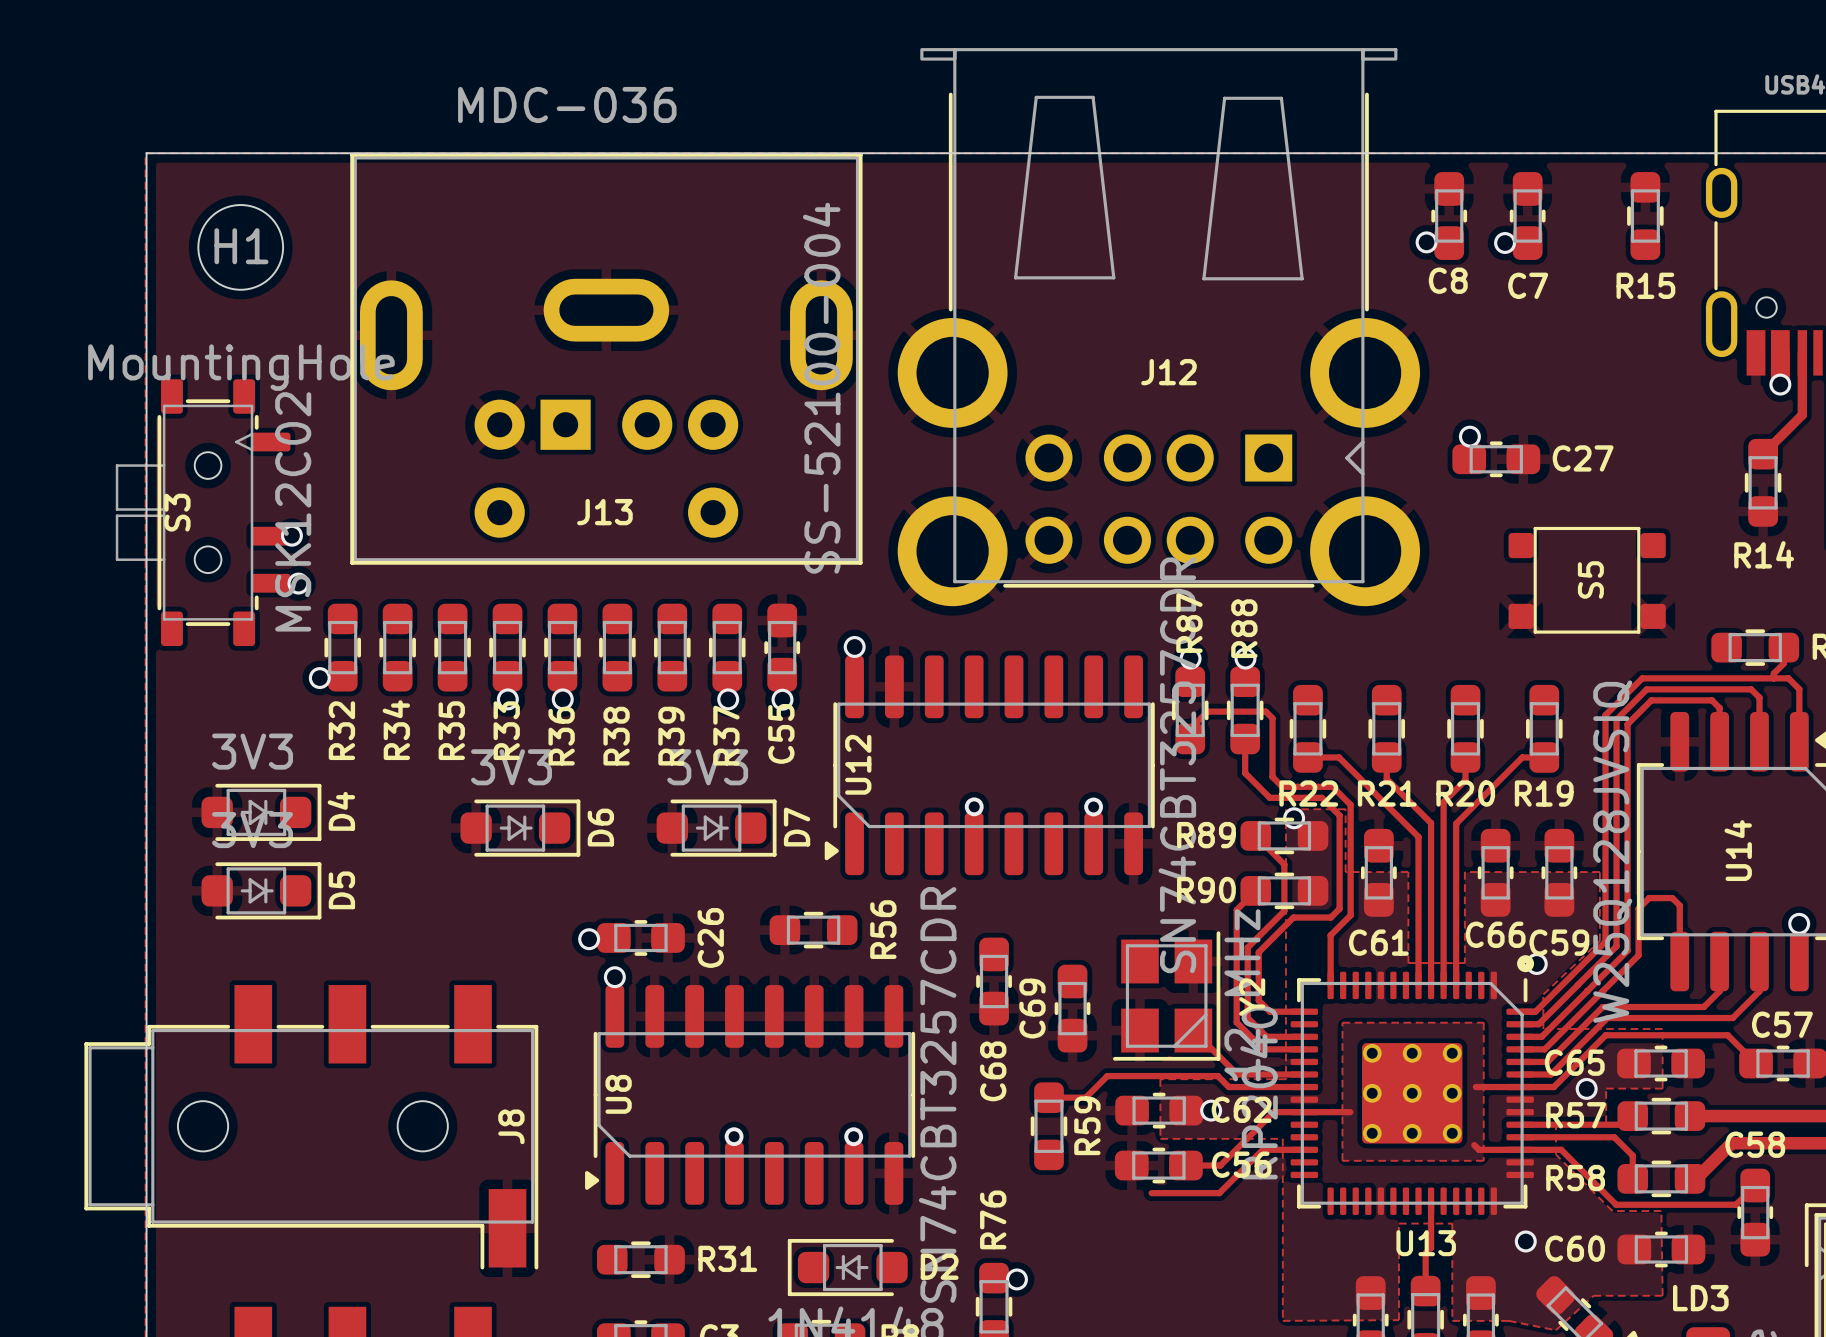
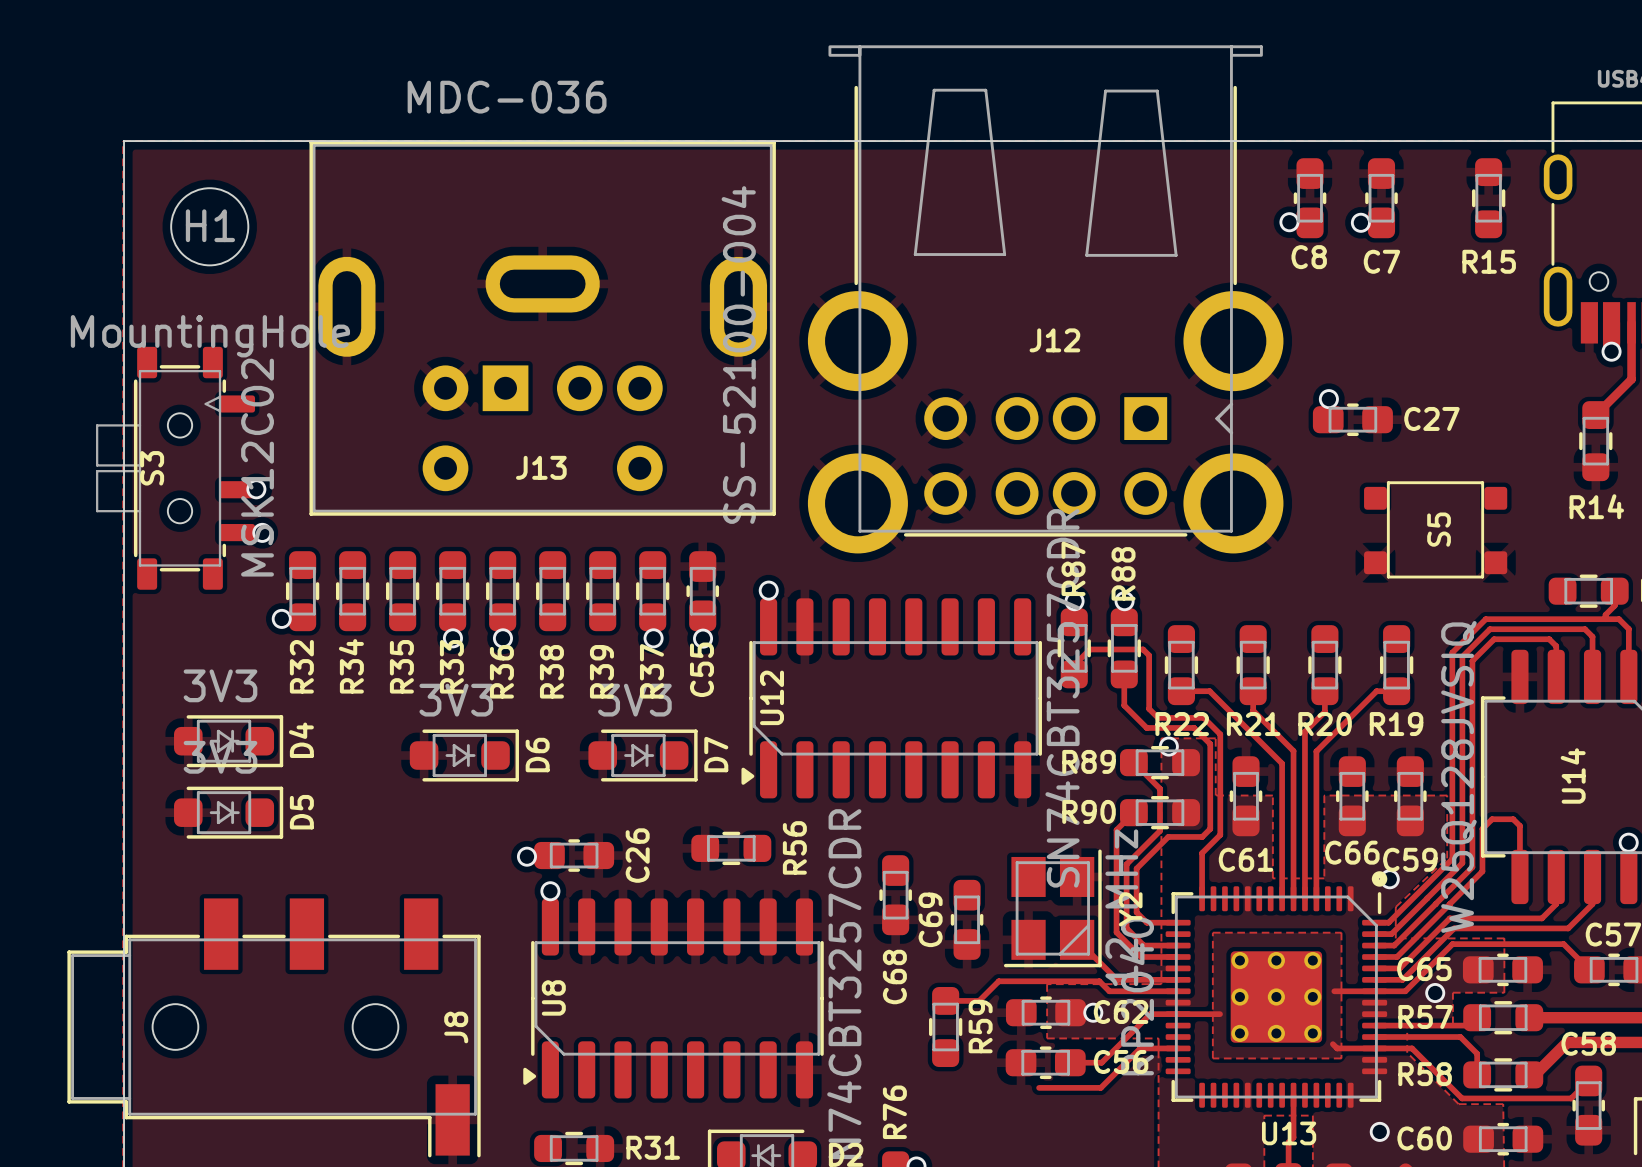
via: (974, 806) -> none
via: (1093, 807) -> none
via: (734, 1136) -> none
via: (853, 1136) -> none

